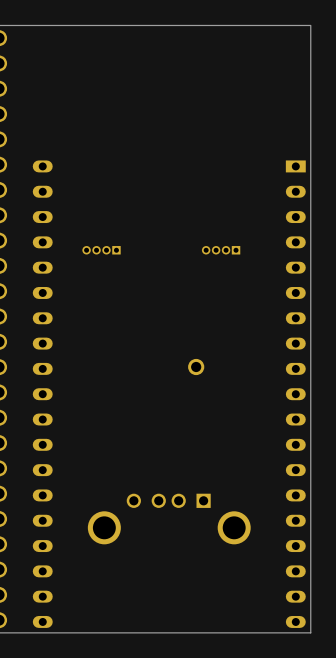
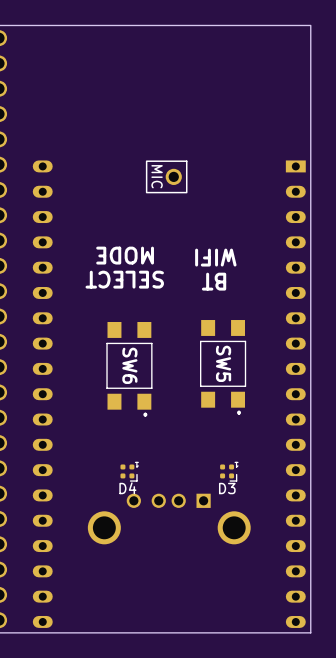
part: none -> (166, 176)
part: (101, 250) -> none
part: (221, 250) -> none
text: none -> MODE (125, 255)
text: none -> WIFI (215, 257)
text: none -> SELECT (124, 279)
text: none -> BT (214, 281)
part: (196, 367) -> none
SW5: none -> (223, 367)
SW6: none -> (129, 369)
D4: none -> (129, 473)
D3: none -> (228, 473)

